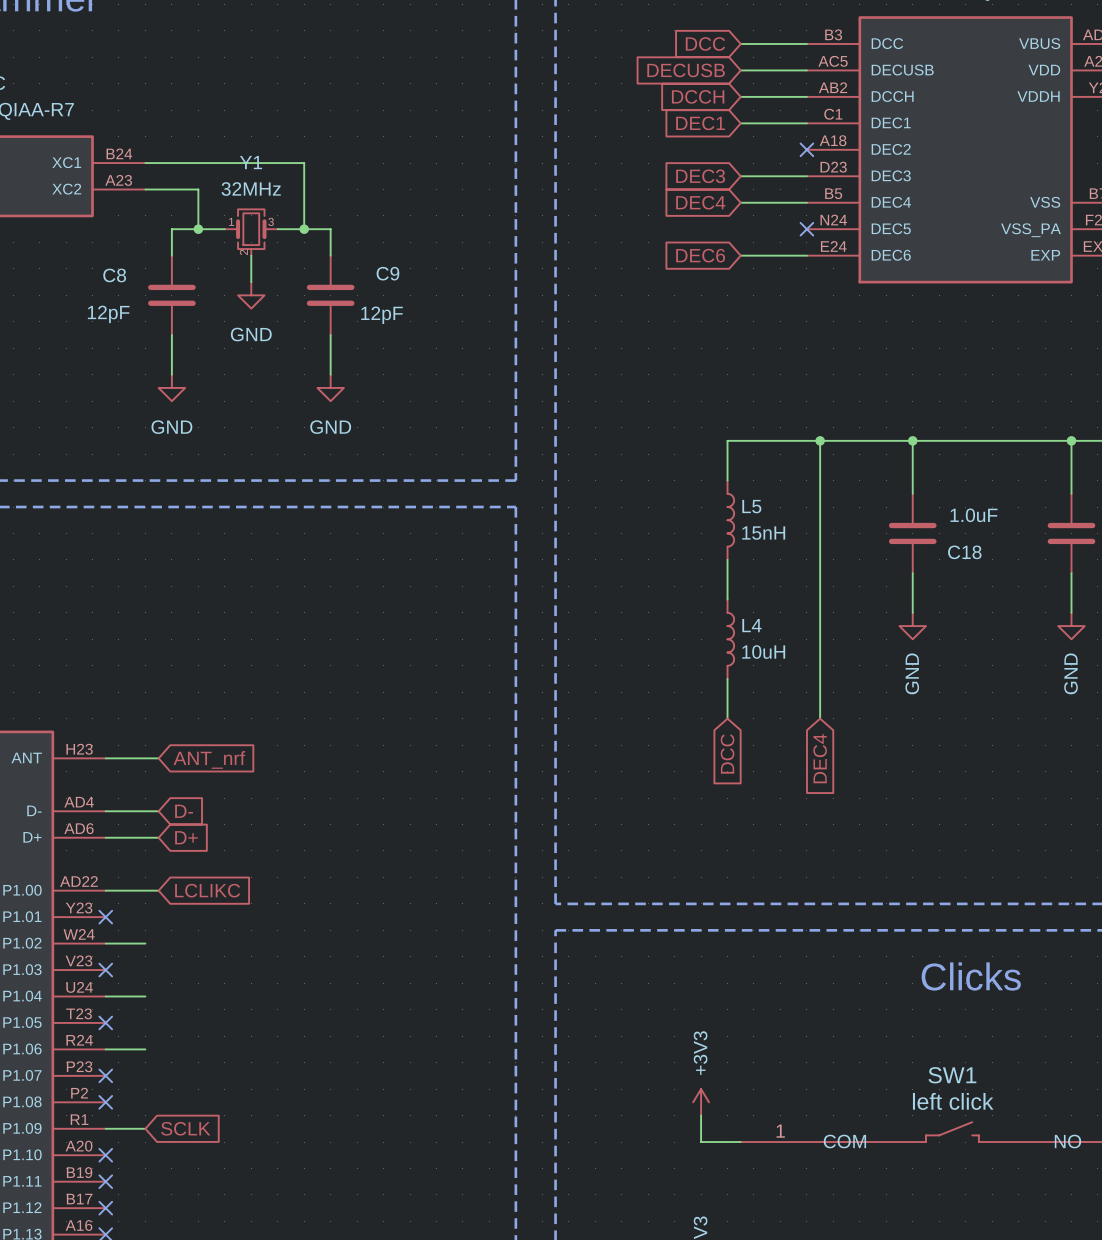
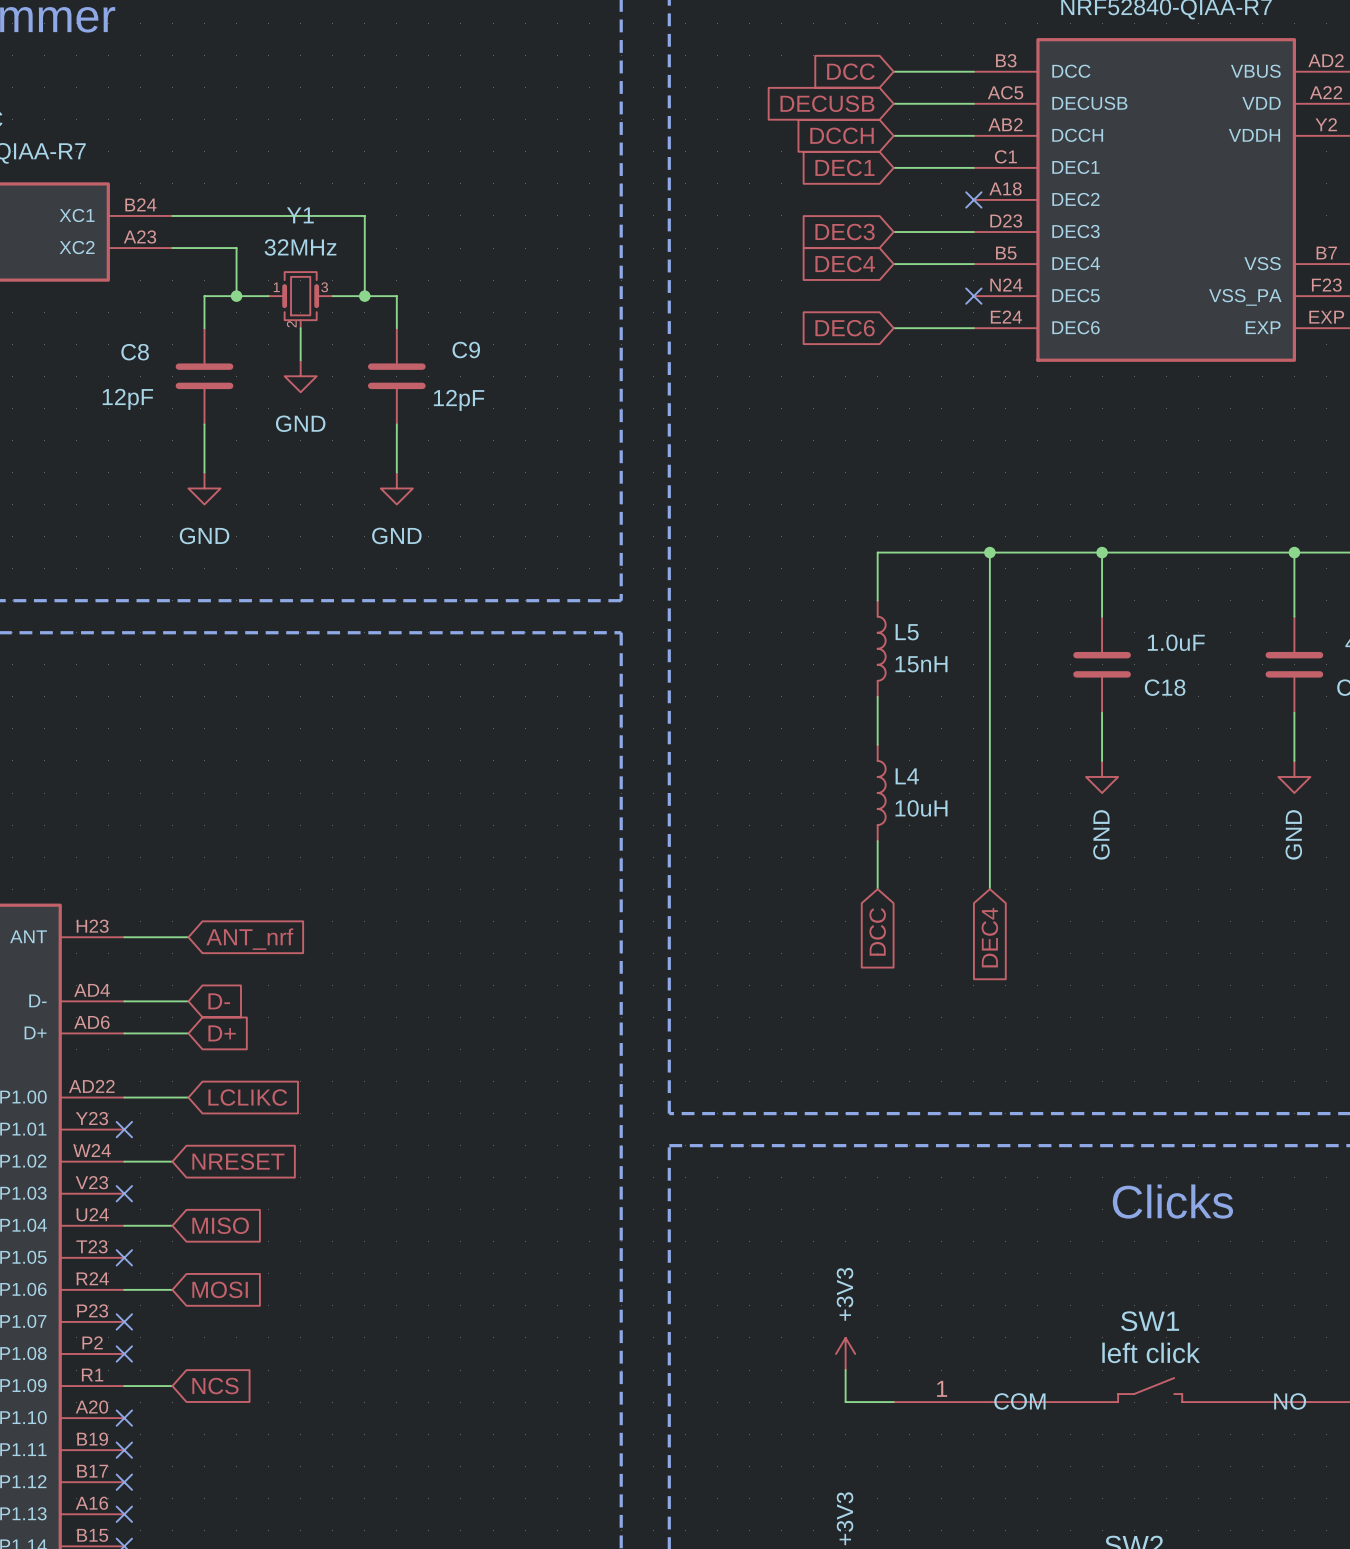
global label: none -> NRESET (238, 1161)
global label: none -> MISO (220, 1225)
global label: none -> MOSI (220, 1289)
global label: SCLK (185, 1128) -> NCS (215, 1386)

